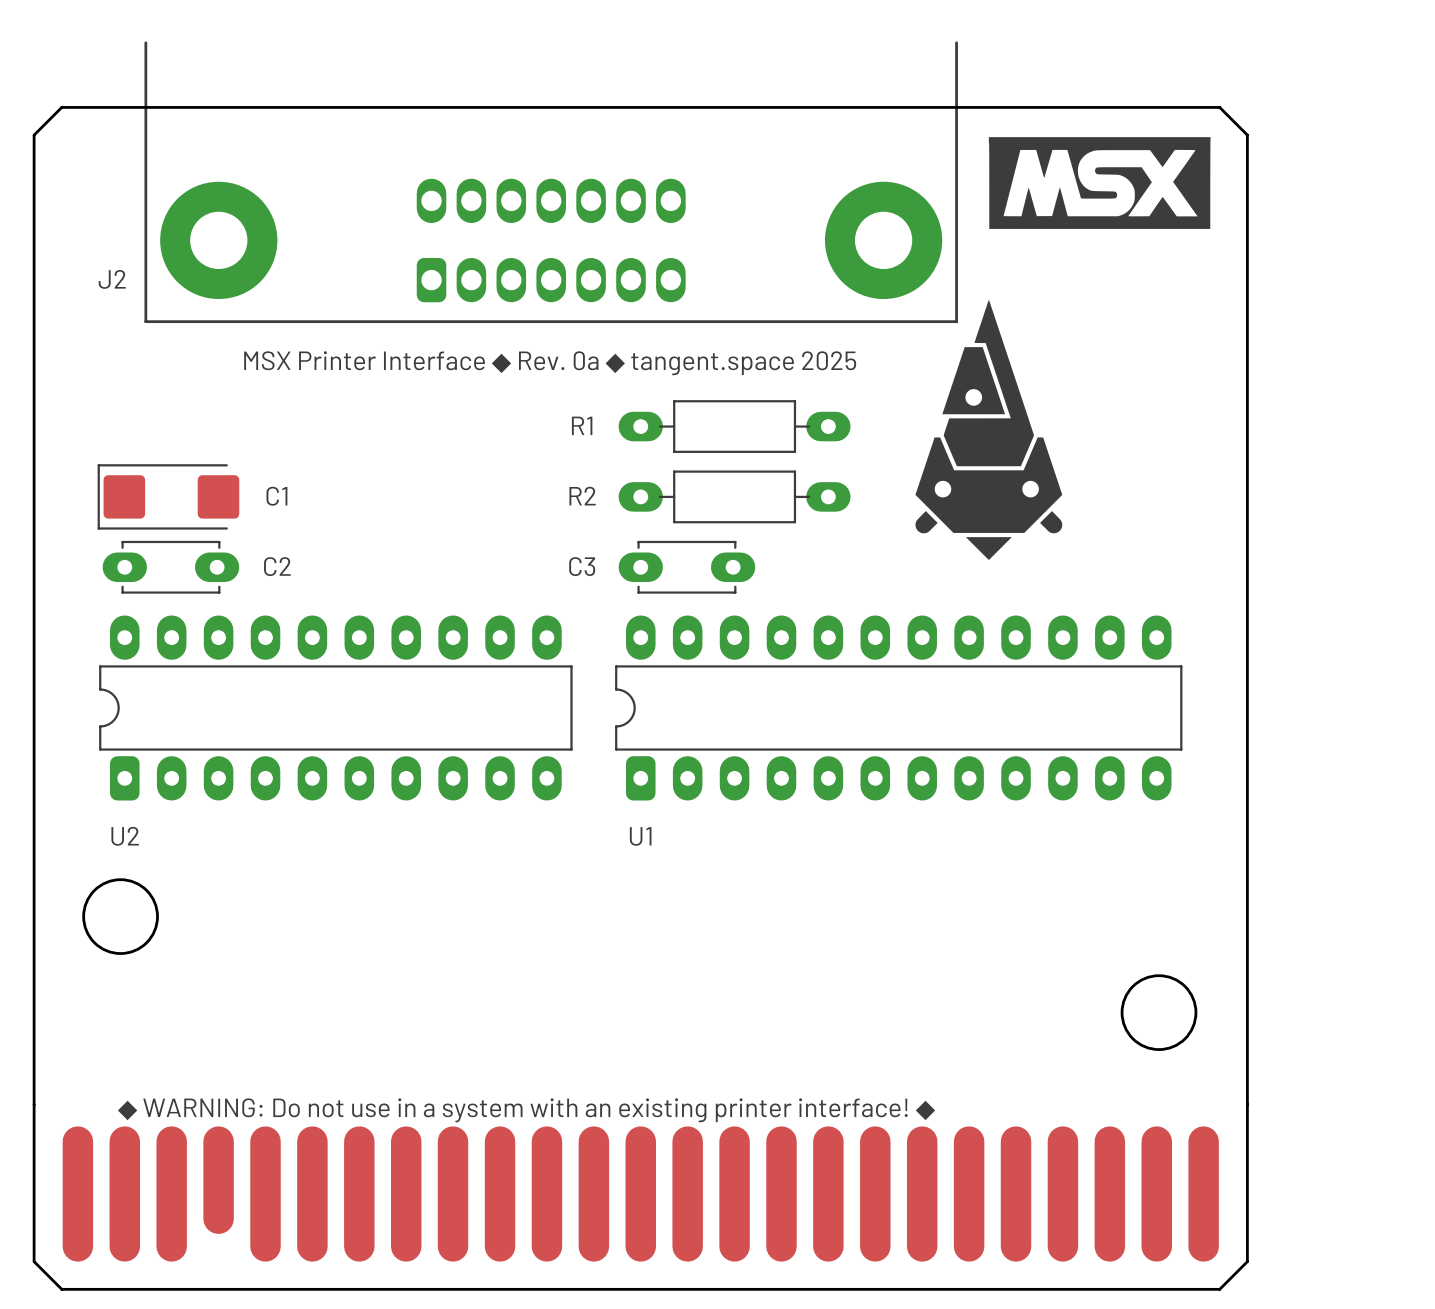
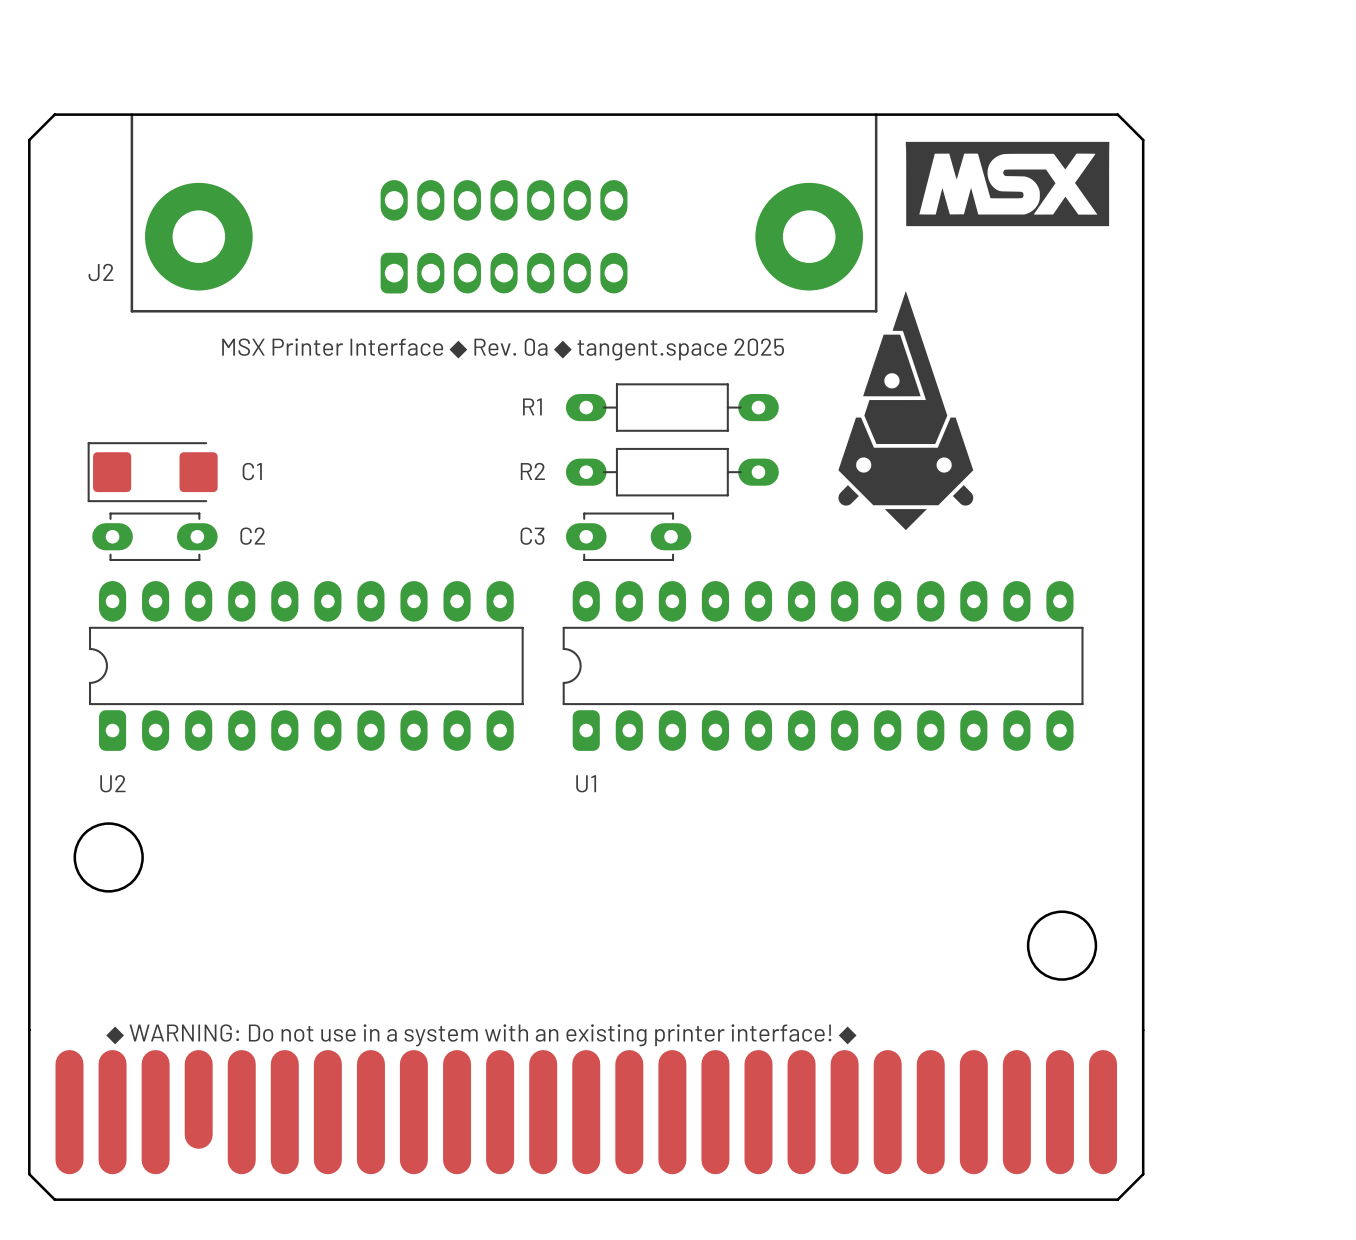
J2 footprint: [144, 41, 958, 324] -> [130, 113, 878, 313]

